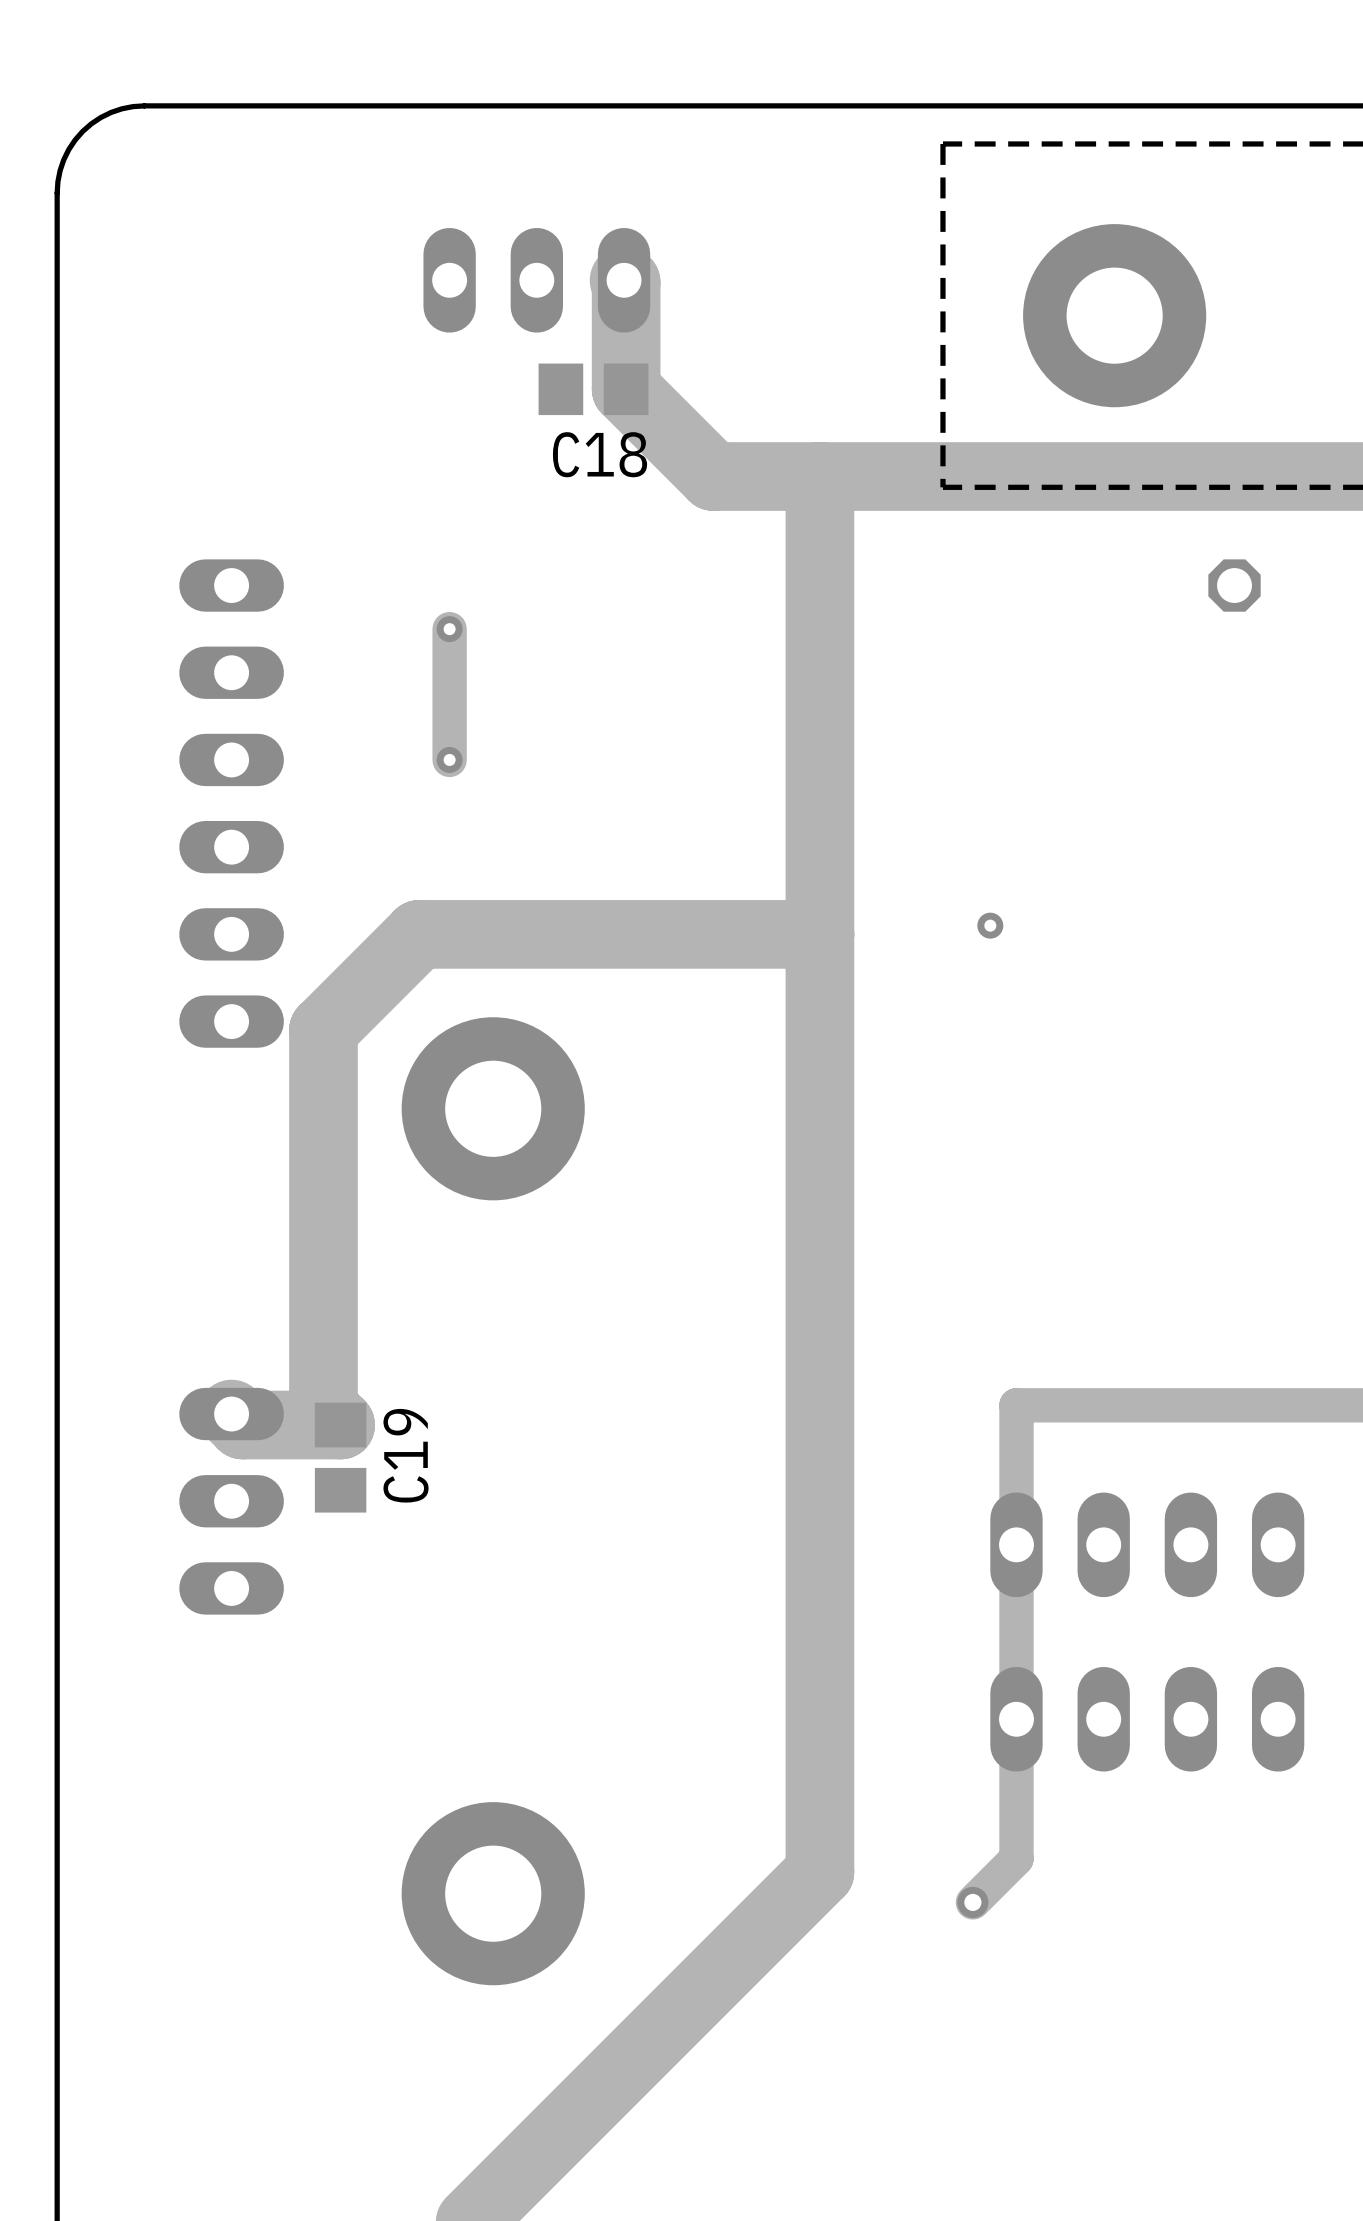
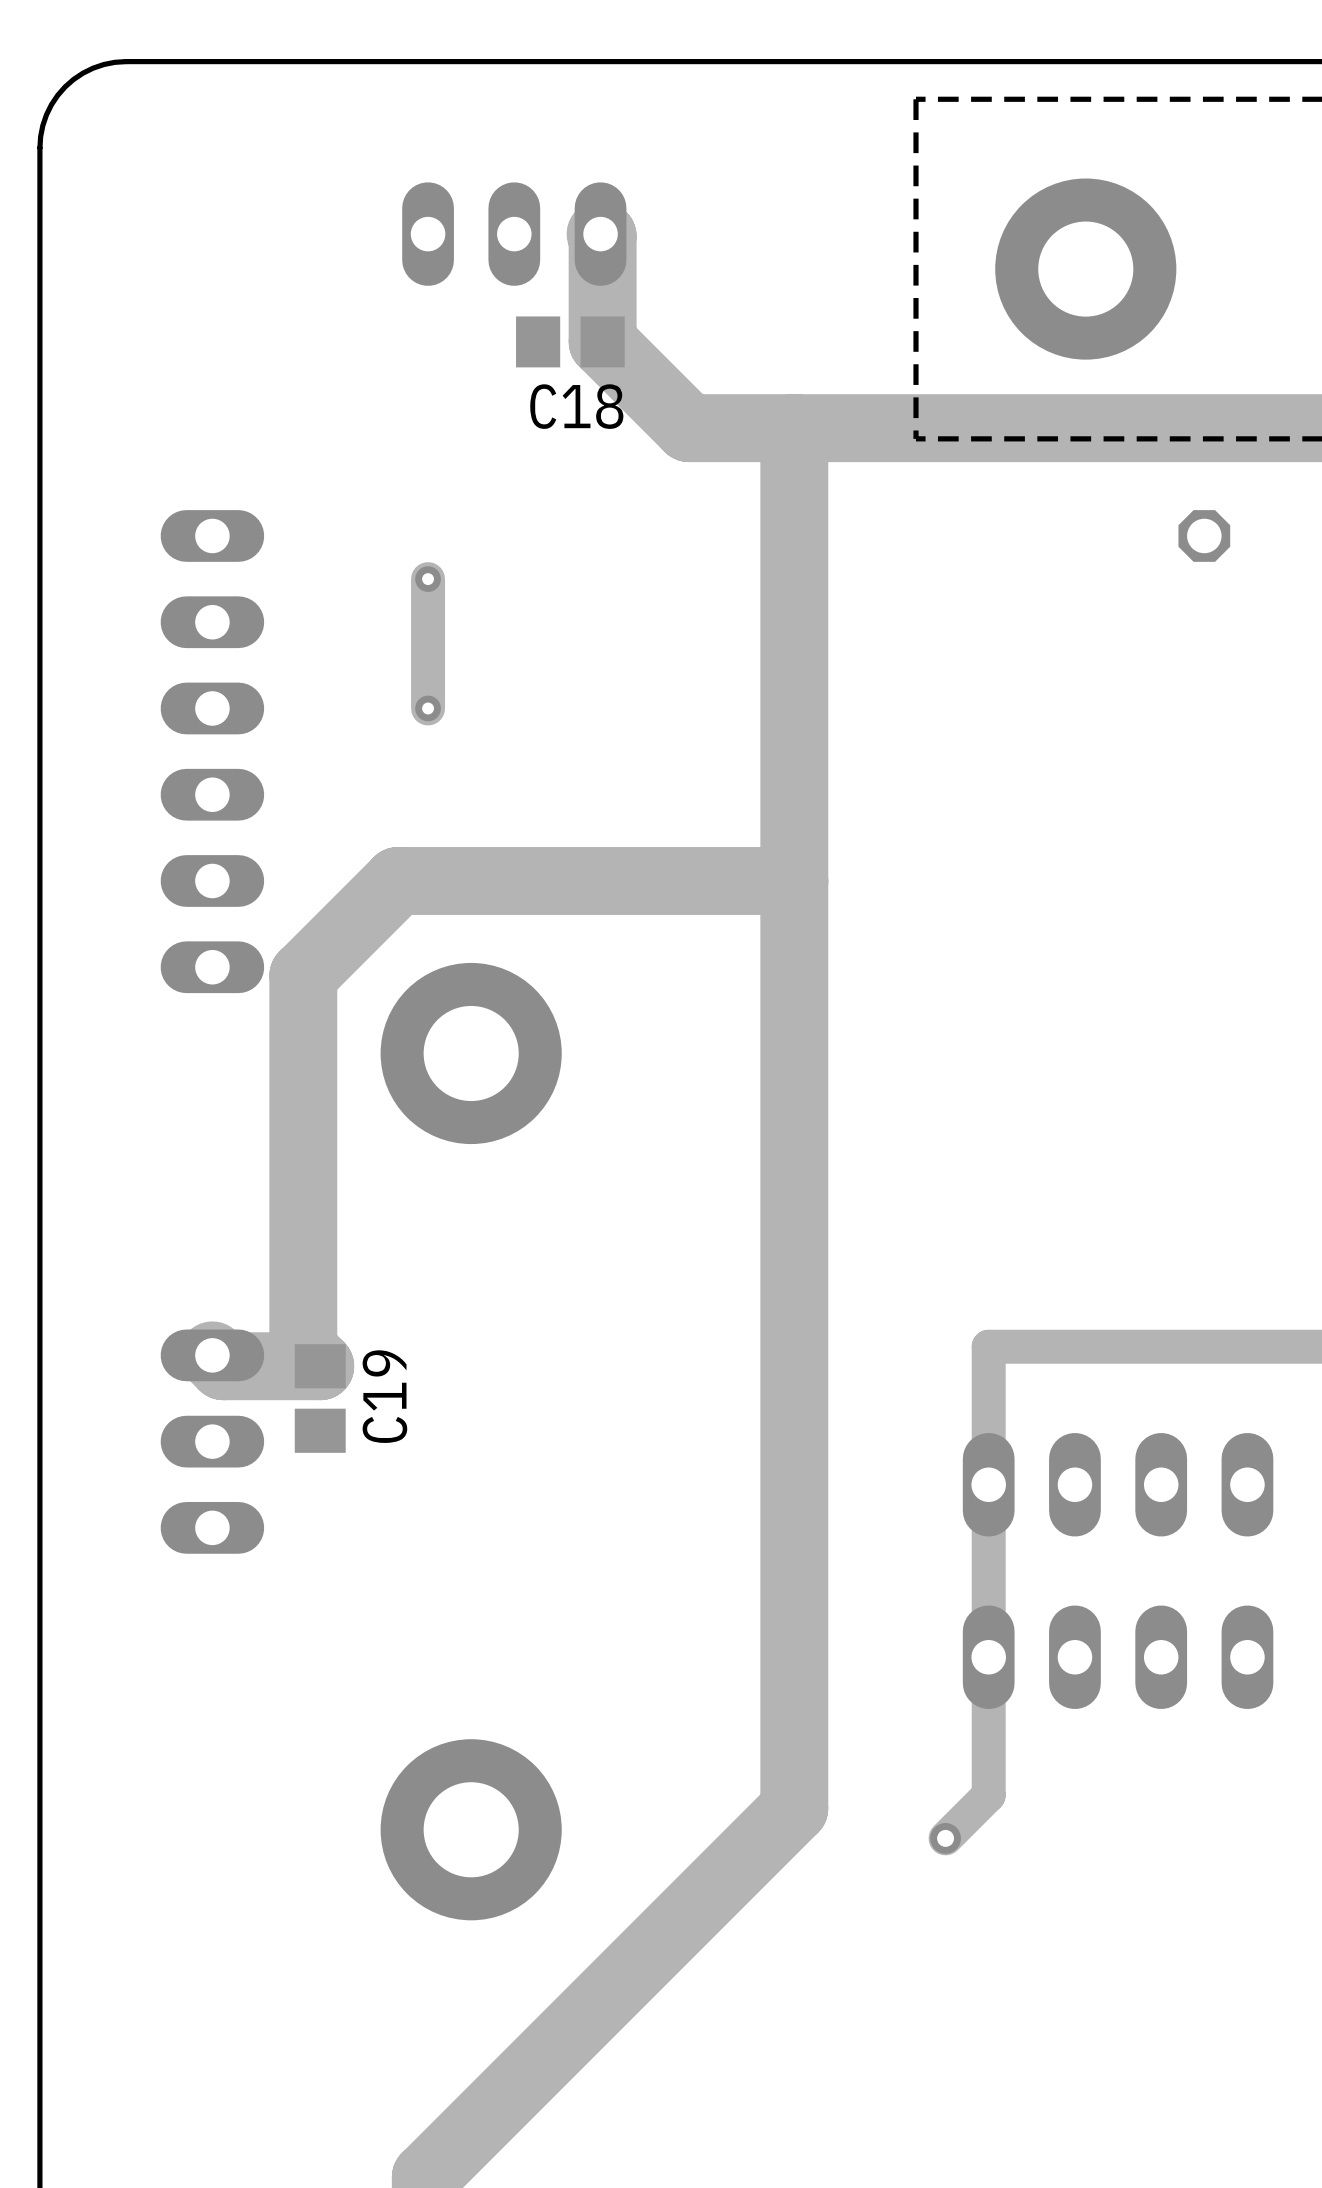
via: (990, 925) -> none

